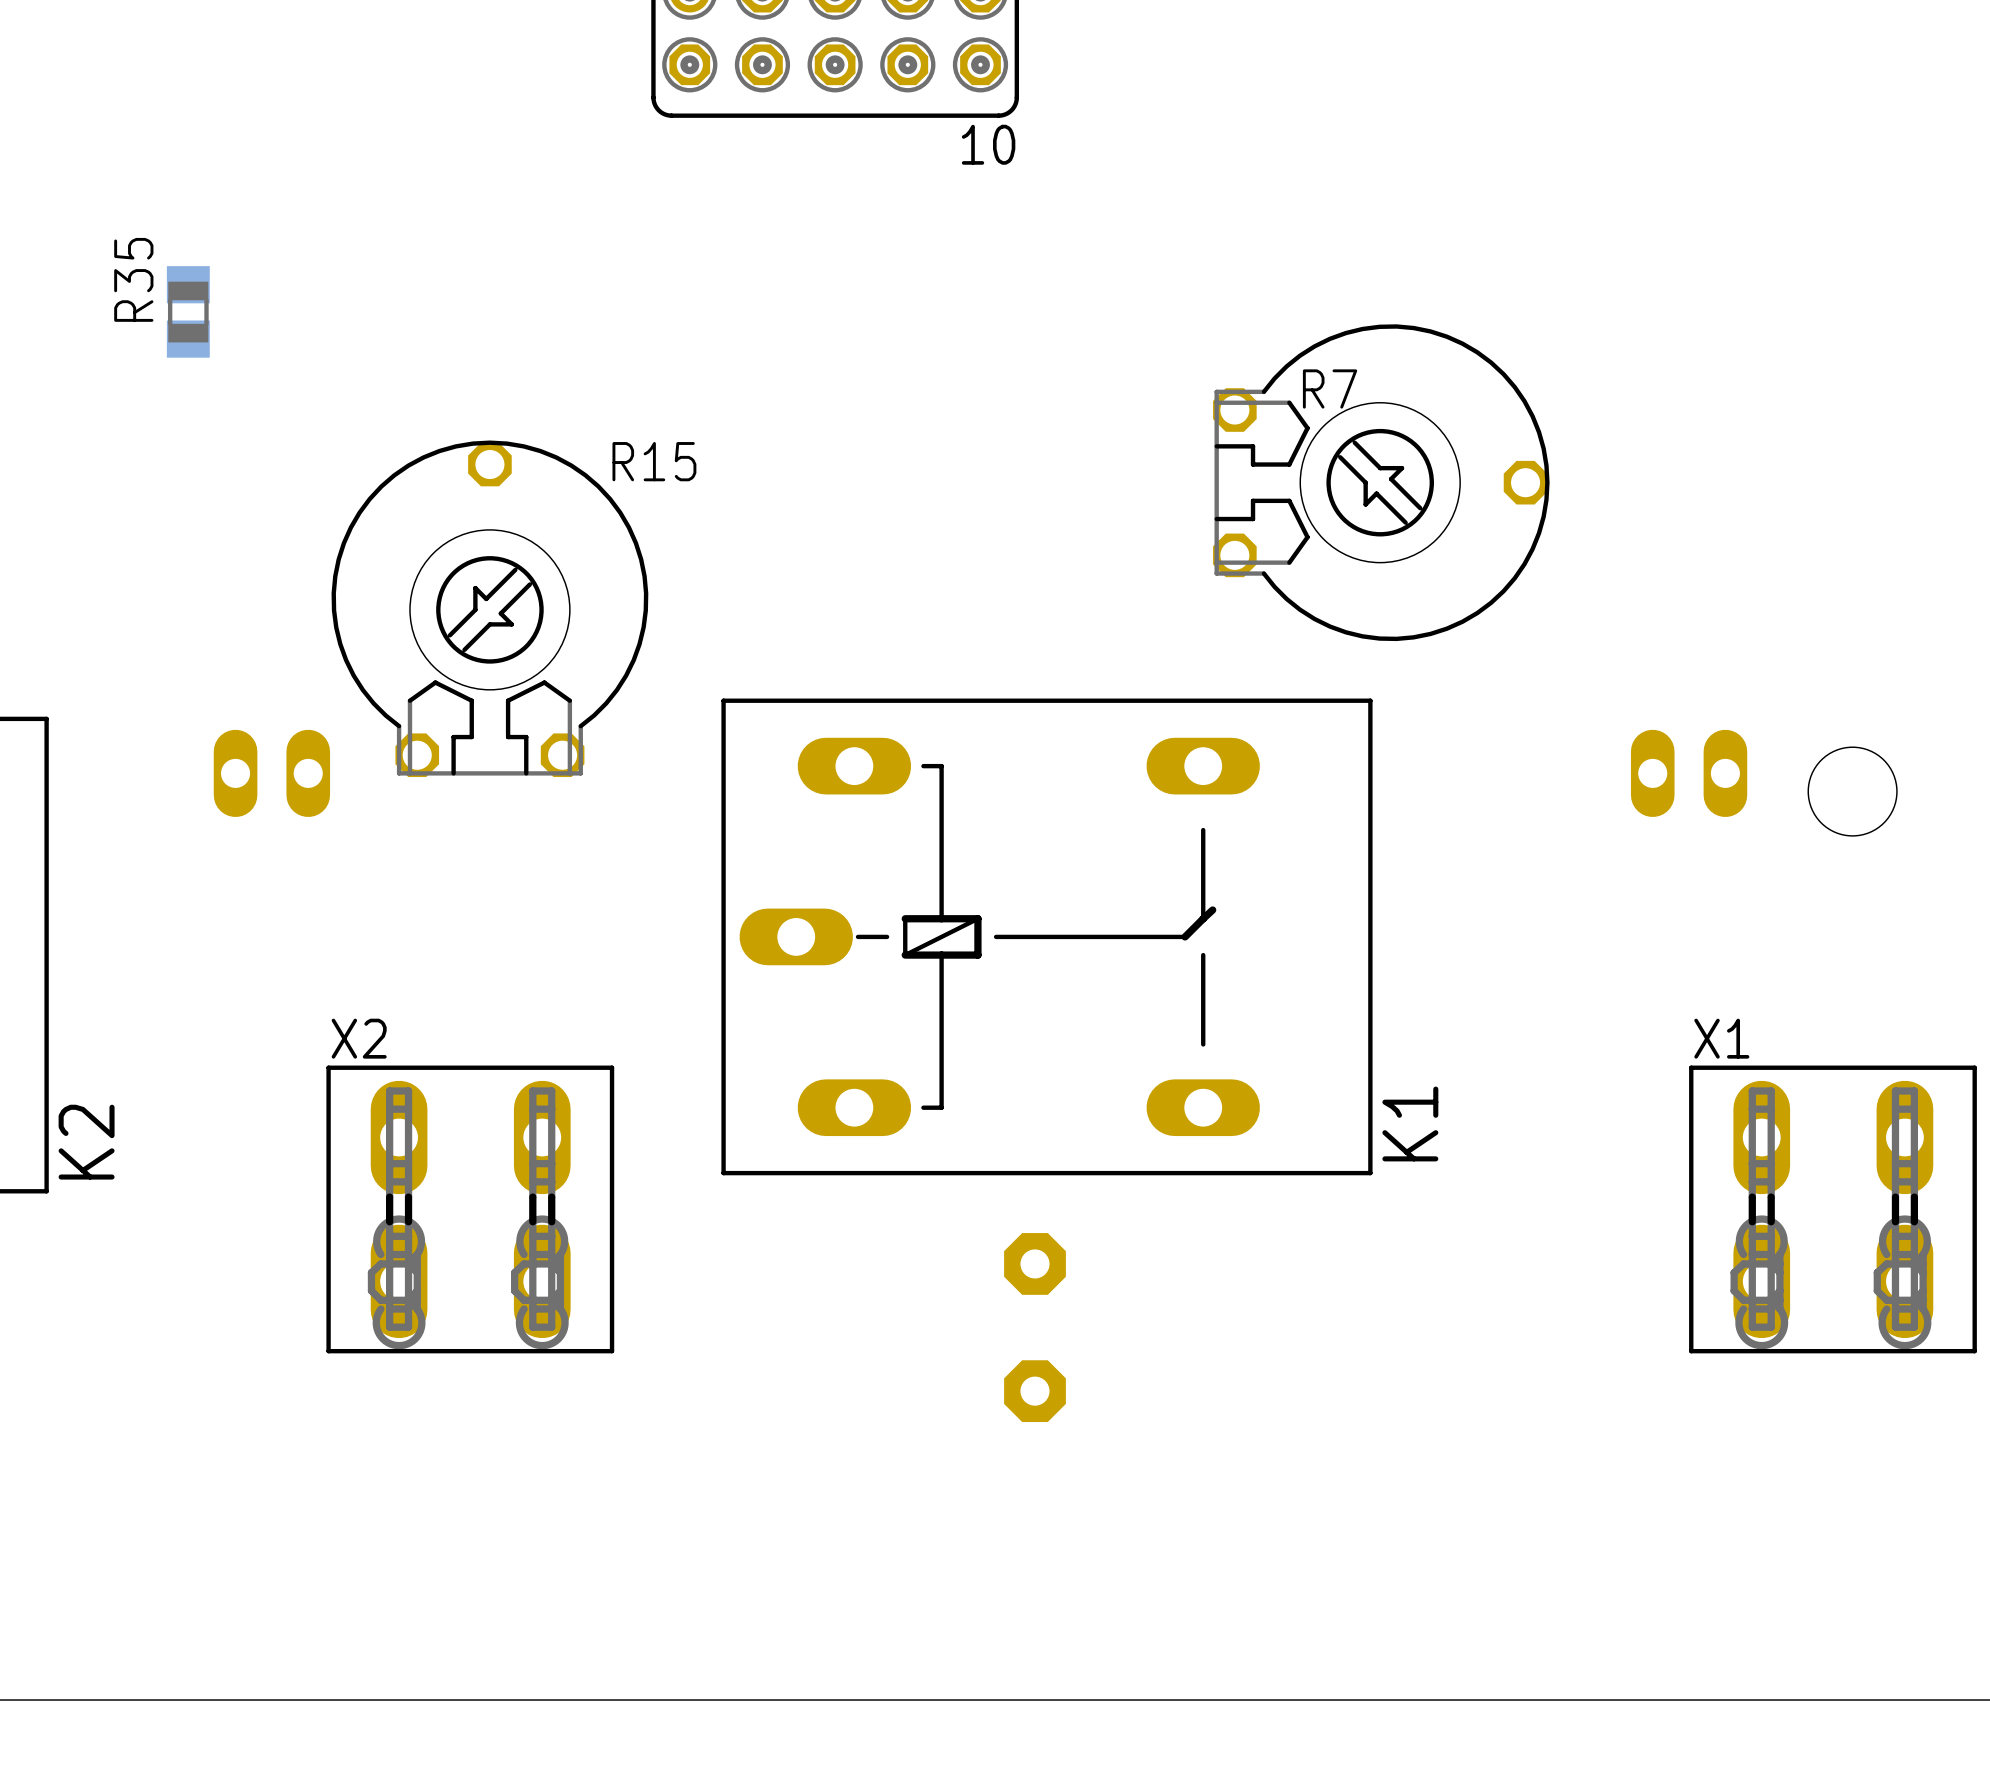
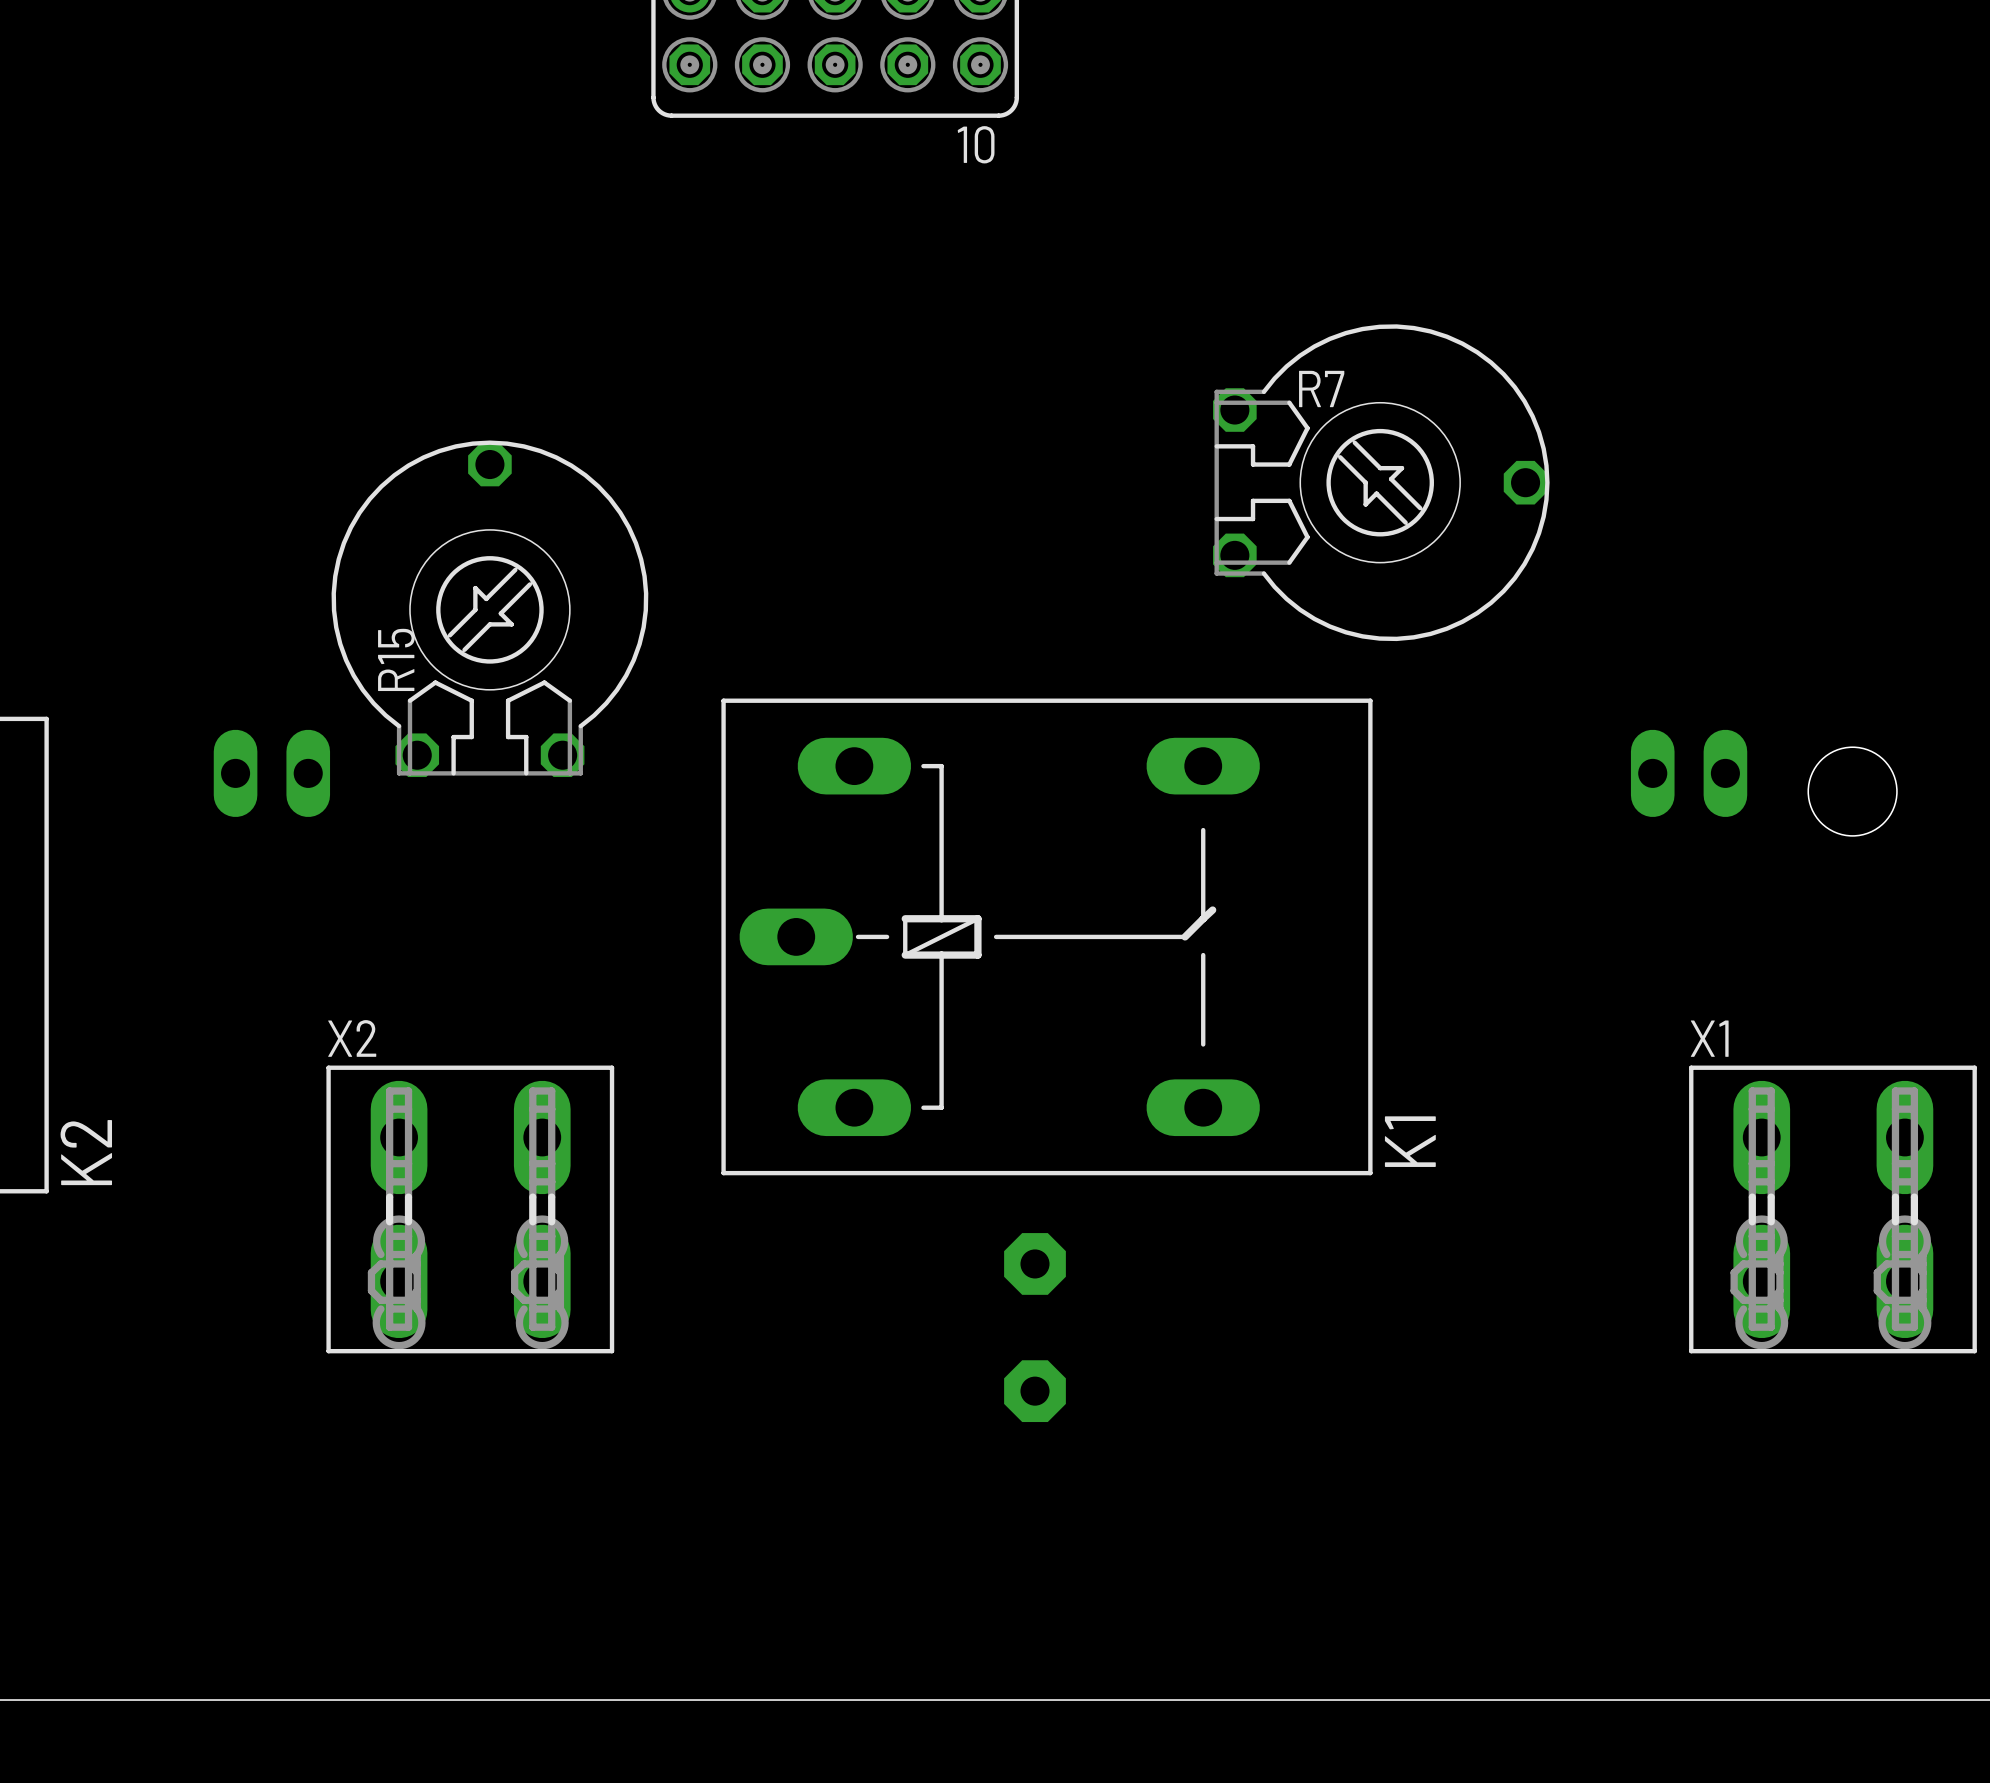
R35: (188, 311) -> none
R15 name rotation: 0° (654, 461) -> 90° counterclockwise (396, 659)
R15 name position: R15 (654, 461) -> R15 (396, 659)

